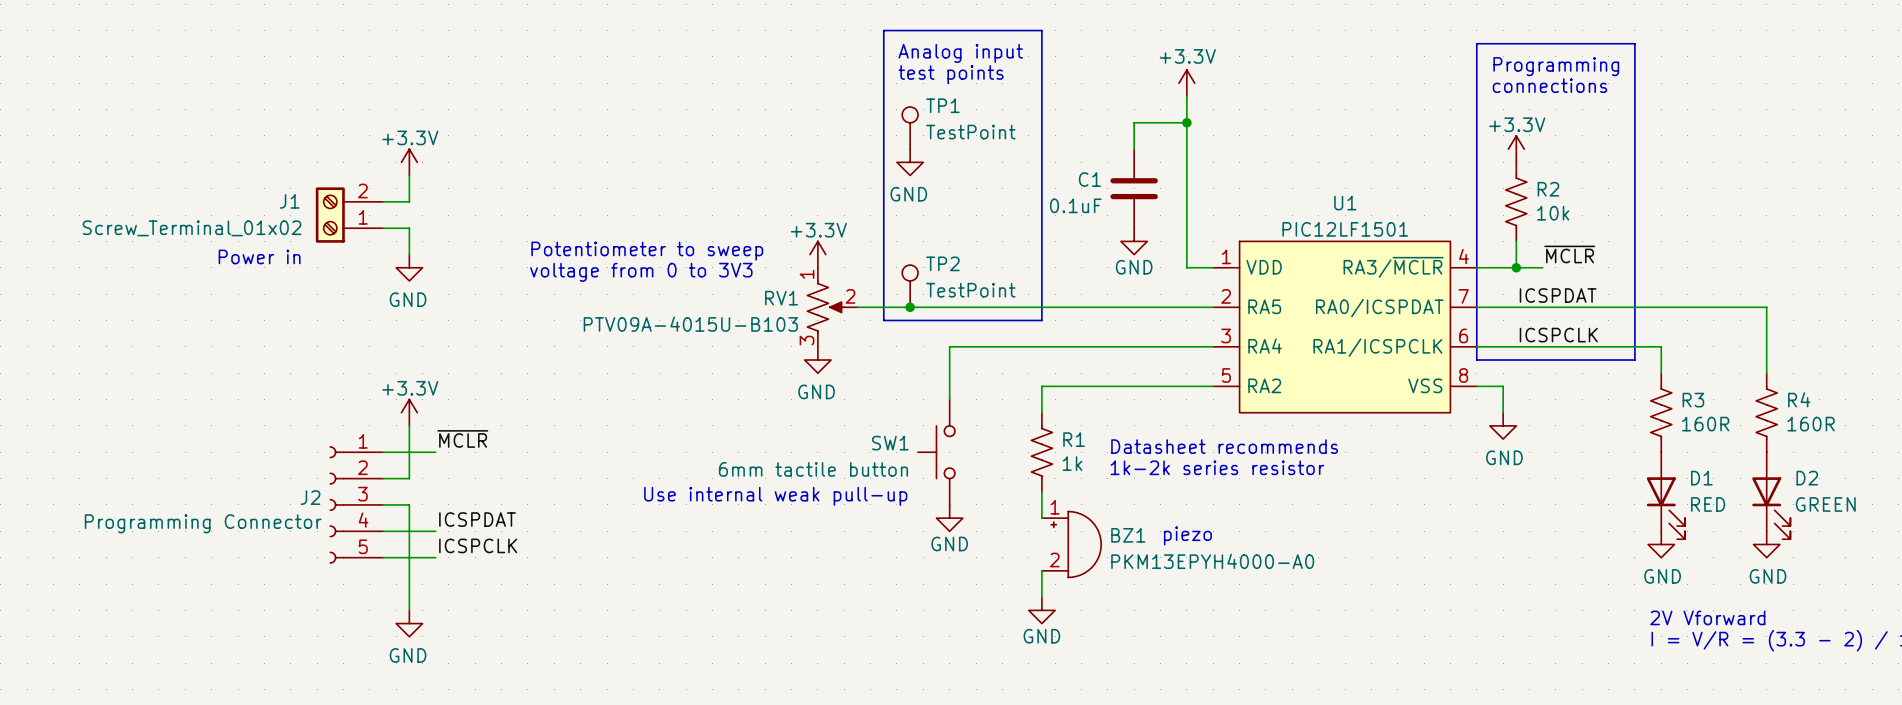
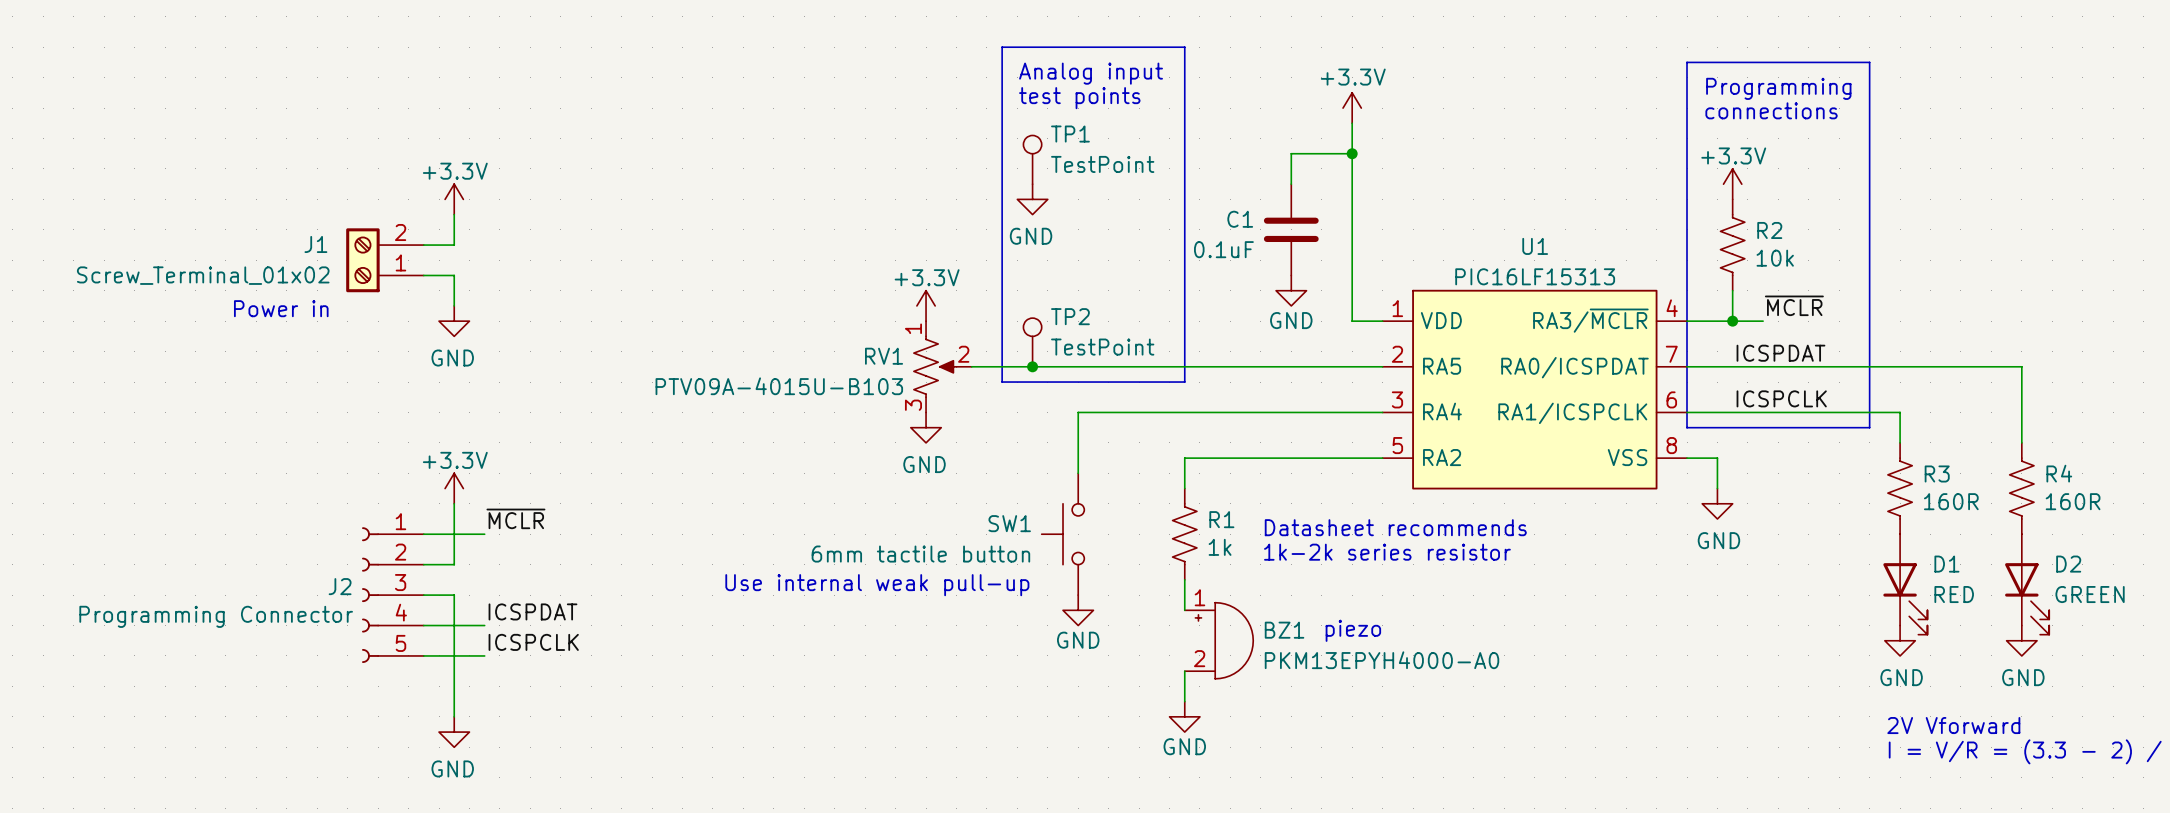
U1 value: PIC12LF1501 (1345, 229) -> PIC16LF15313 (1535, 276)
text: Potentiometer to sweep (647, 251) -> none
text: voltage from 0 to 3V3 (641, 272) -> none

